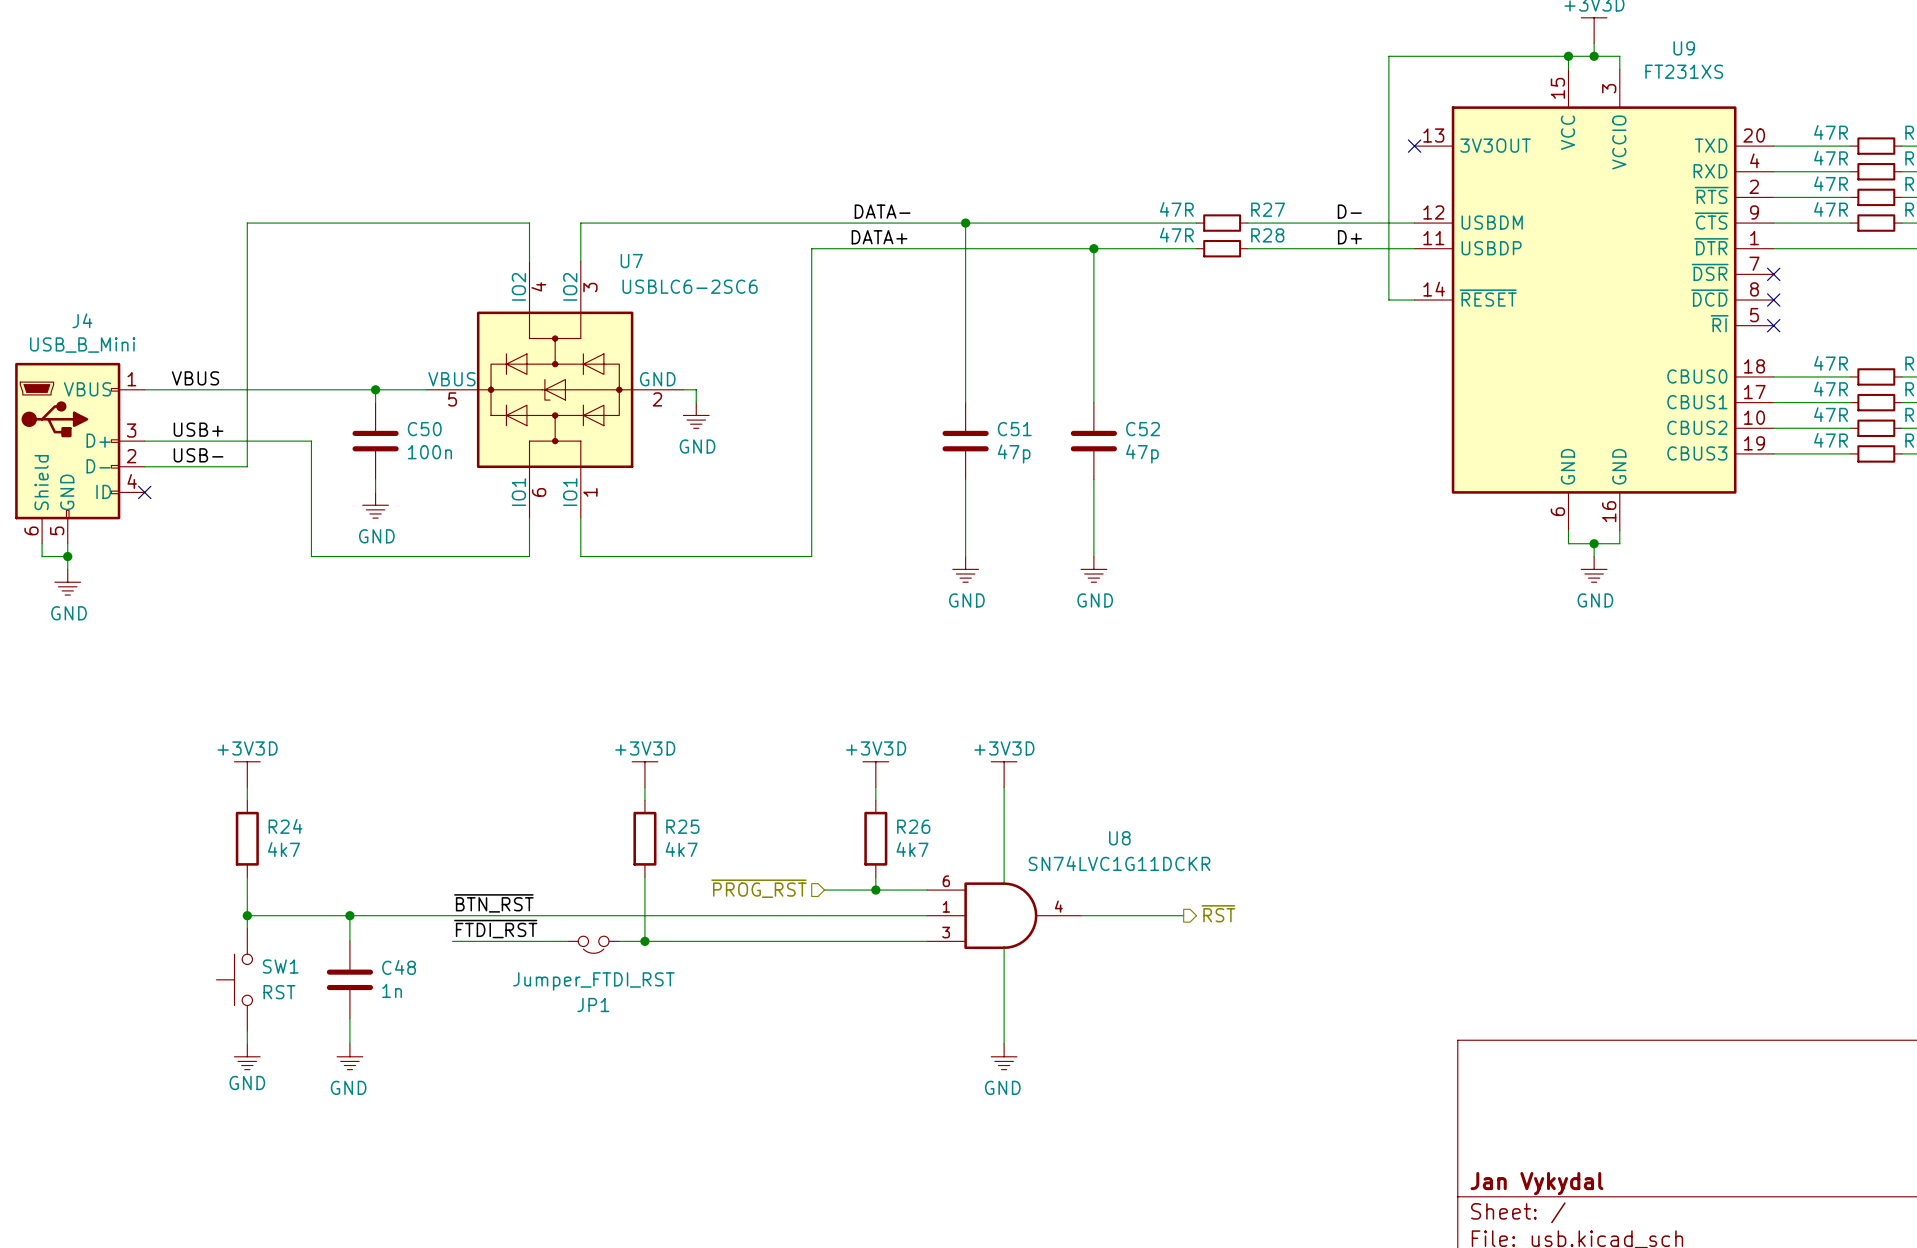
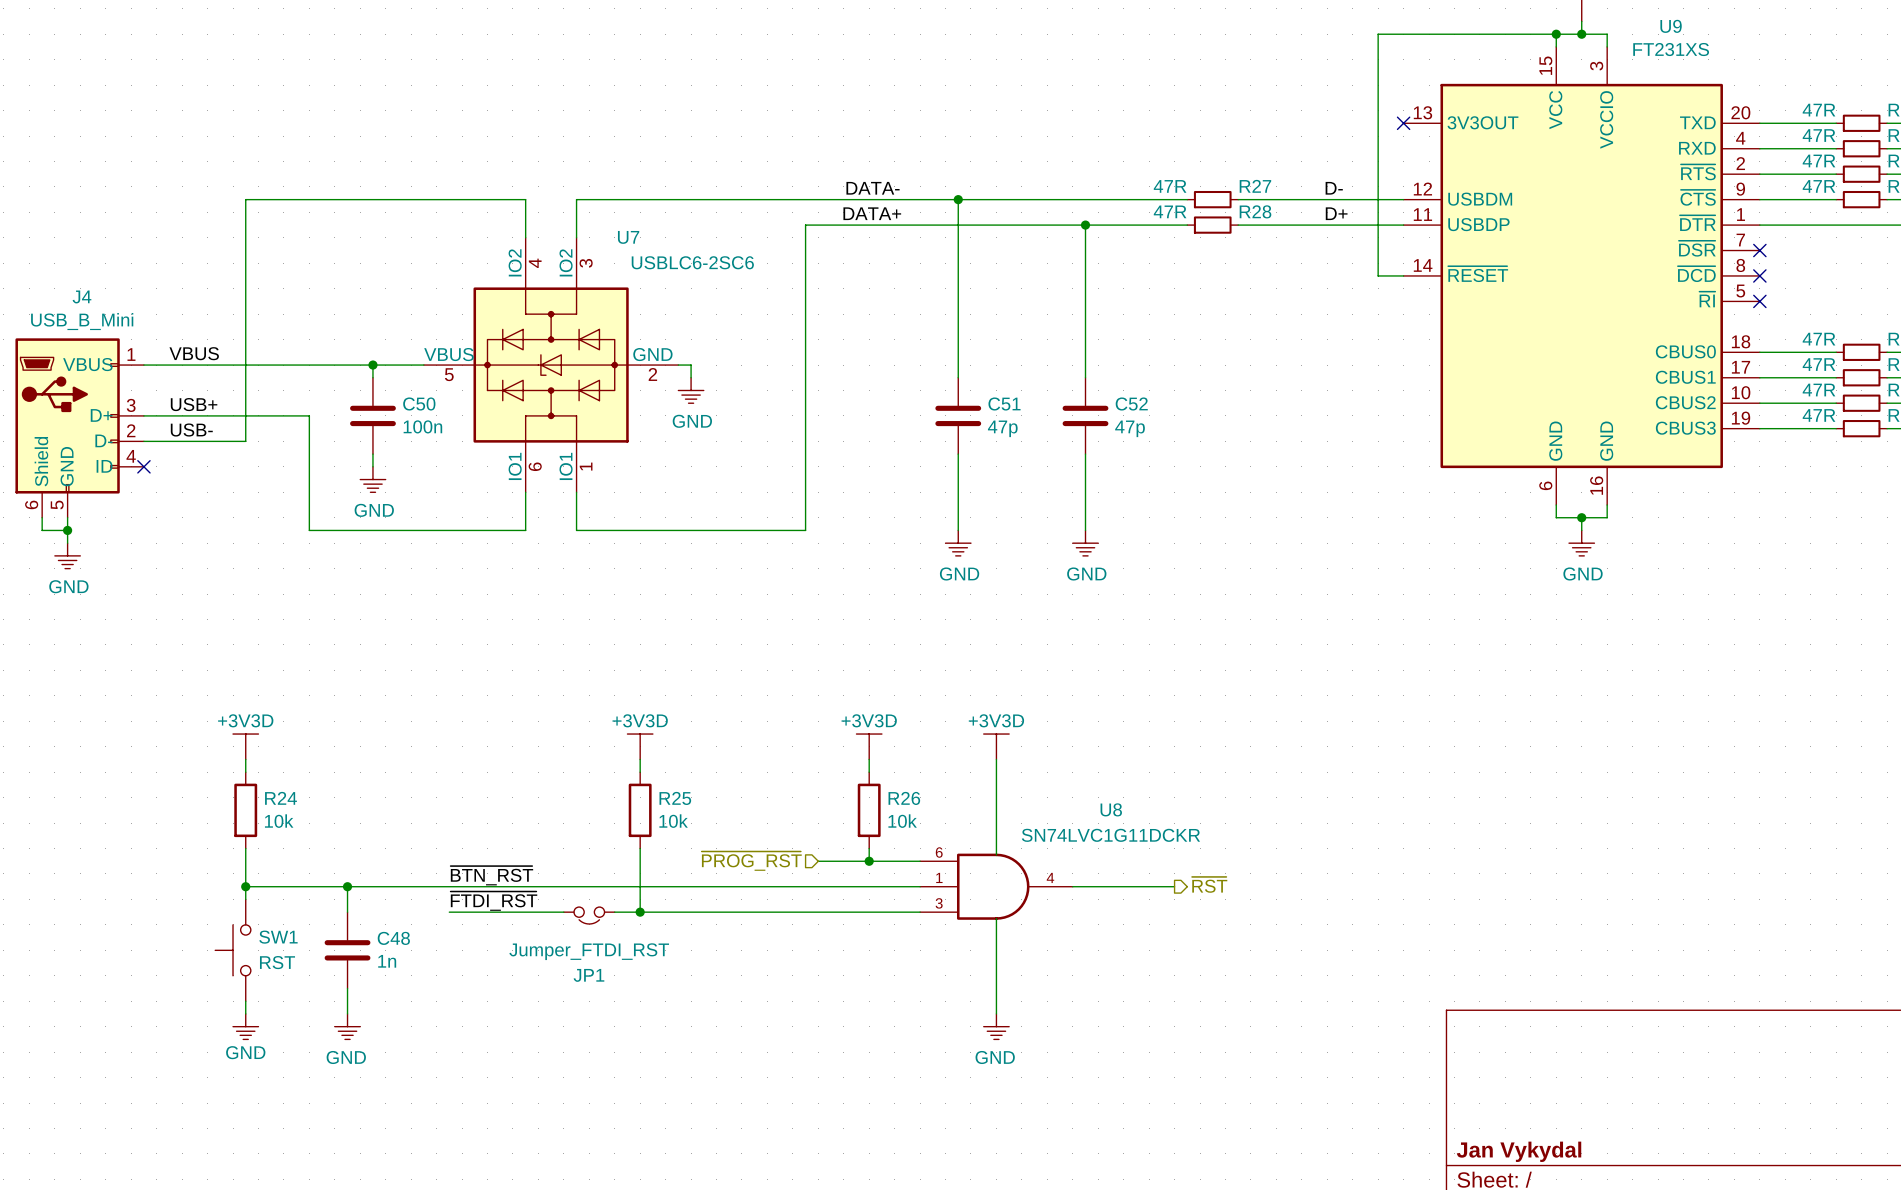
R24 value: 4k7 (284, 849) -> 10k (279, 821)
R25 value: 4k7 (681, 849) -> 10k (673, 821)
R26 value: 4k7 (912, 849) -> 10k (902, 821)

